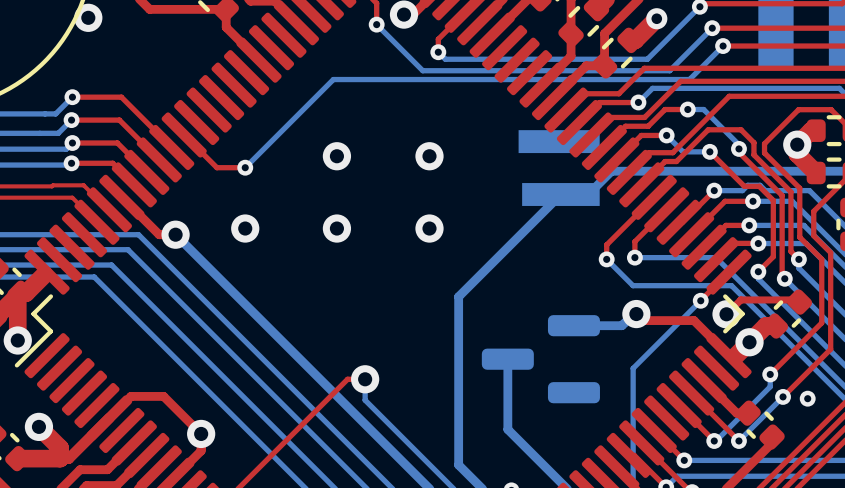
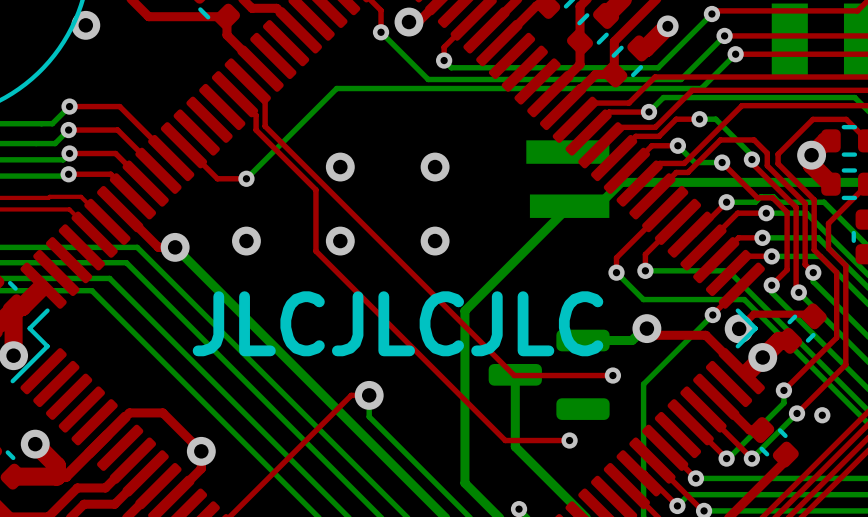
top track: none -> (247, 81) (265, 98) (265, 126) (514, 375) (612, 375)
top track: none -> (235, 94) (256, 115) (256, 130) (315, 189) (315, 251) (505, 440) (569, 440)
text: none -> JLCJLCJLC (397, 323)
via: none -> (612, 375)
via: none -> (569, 440)

